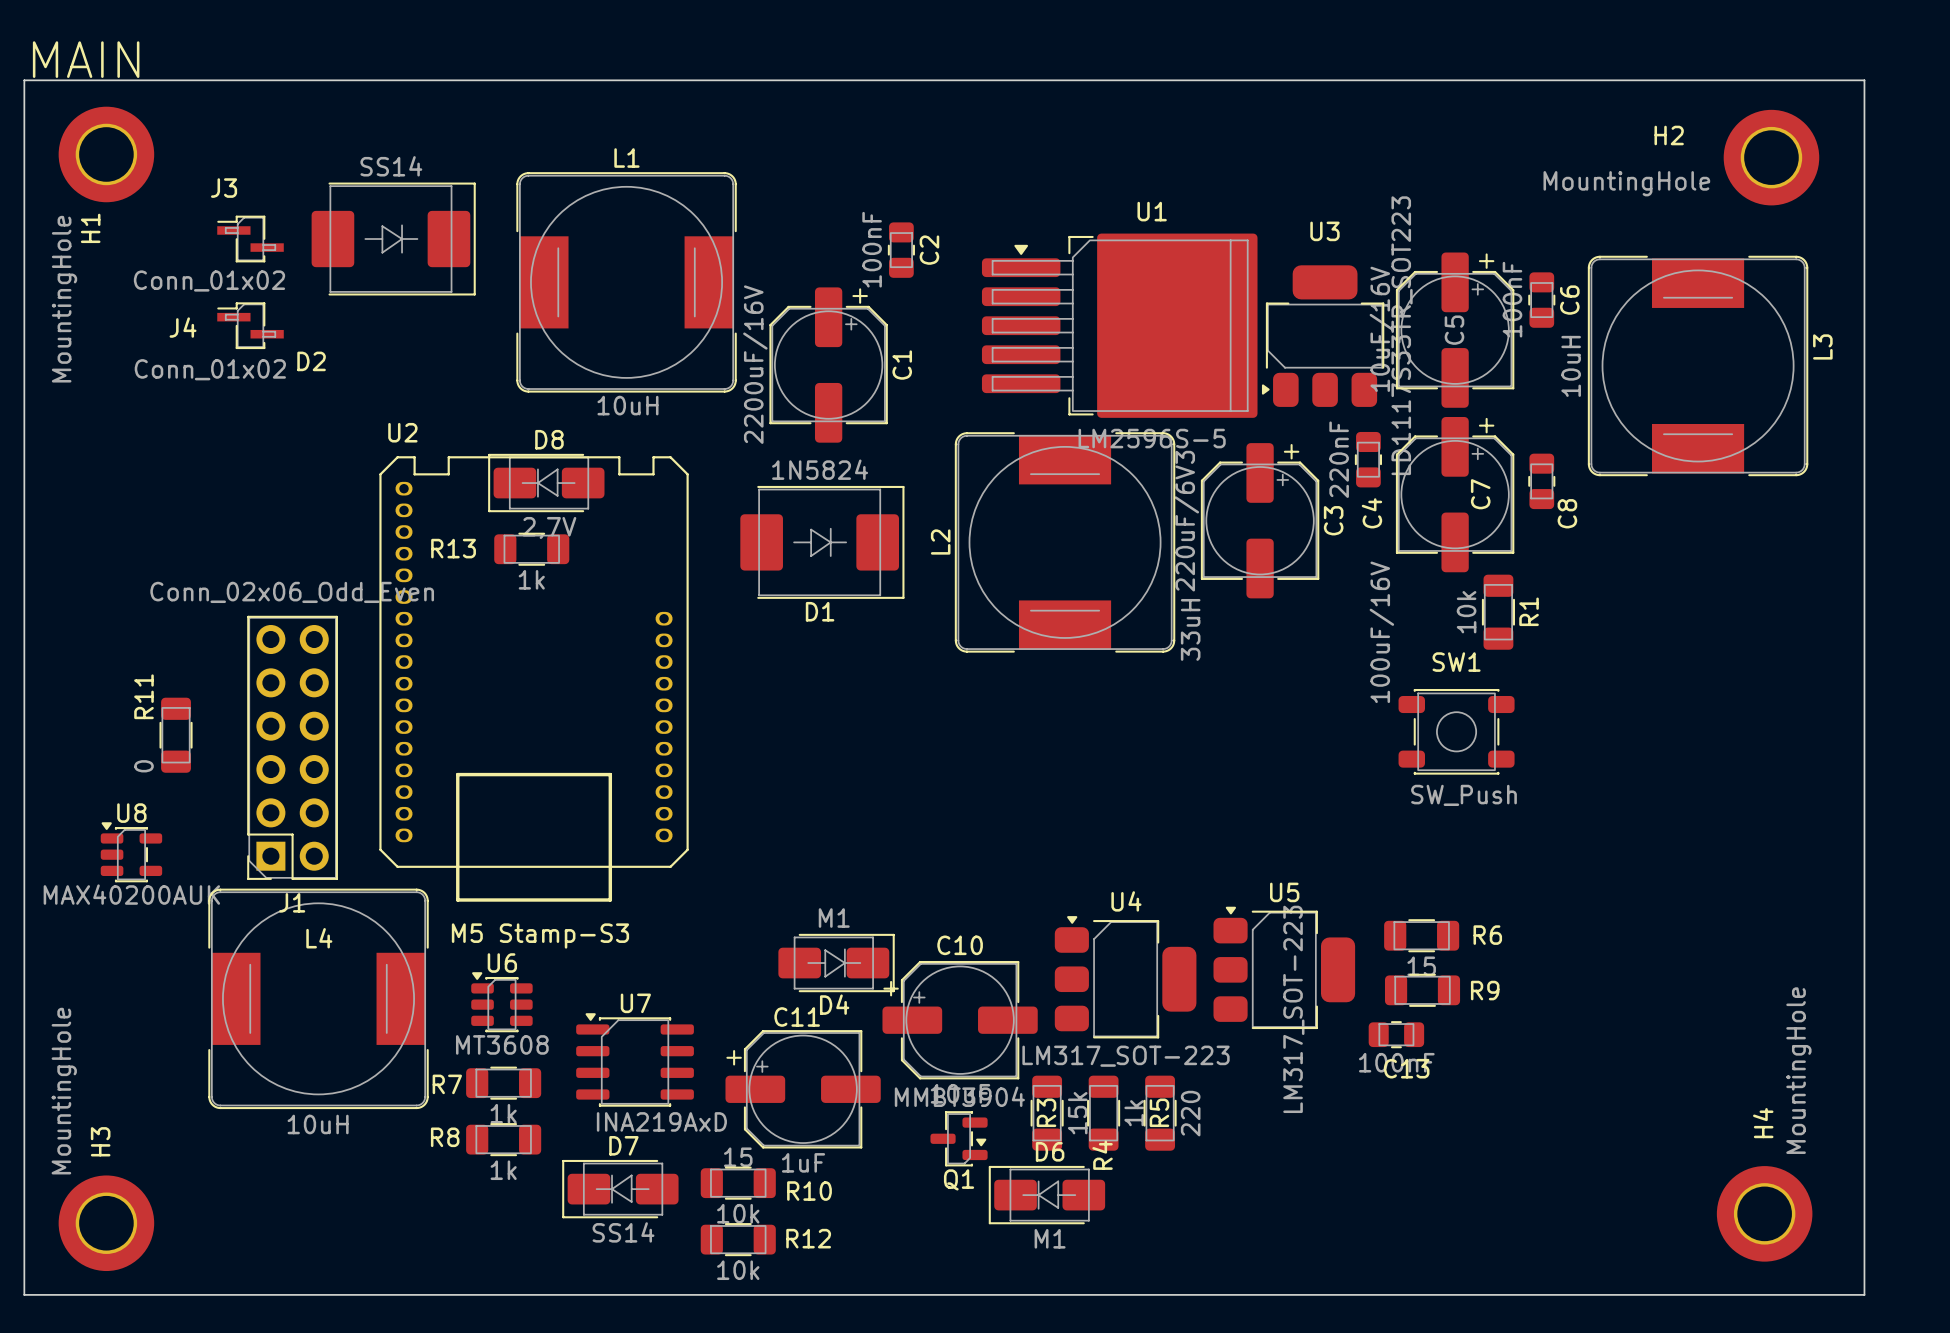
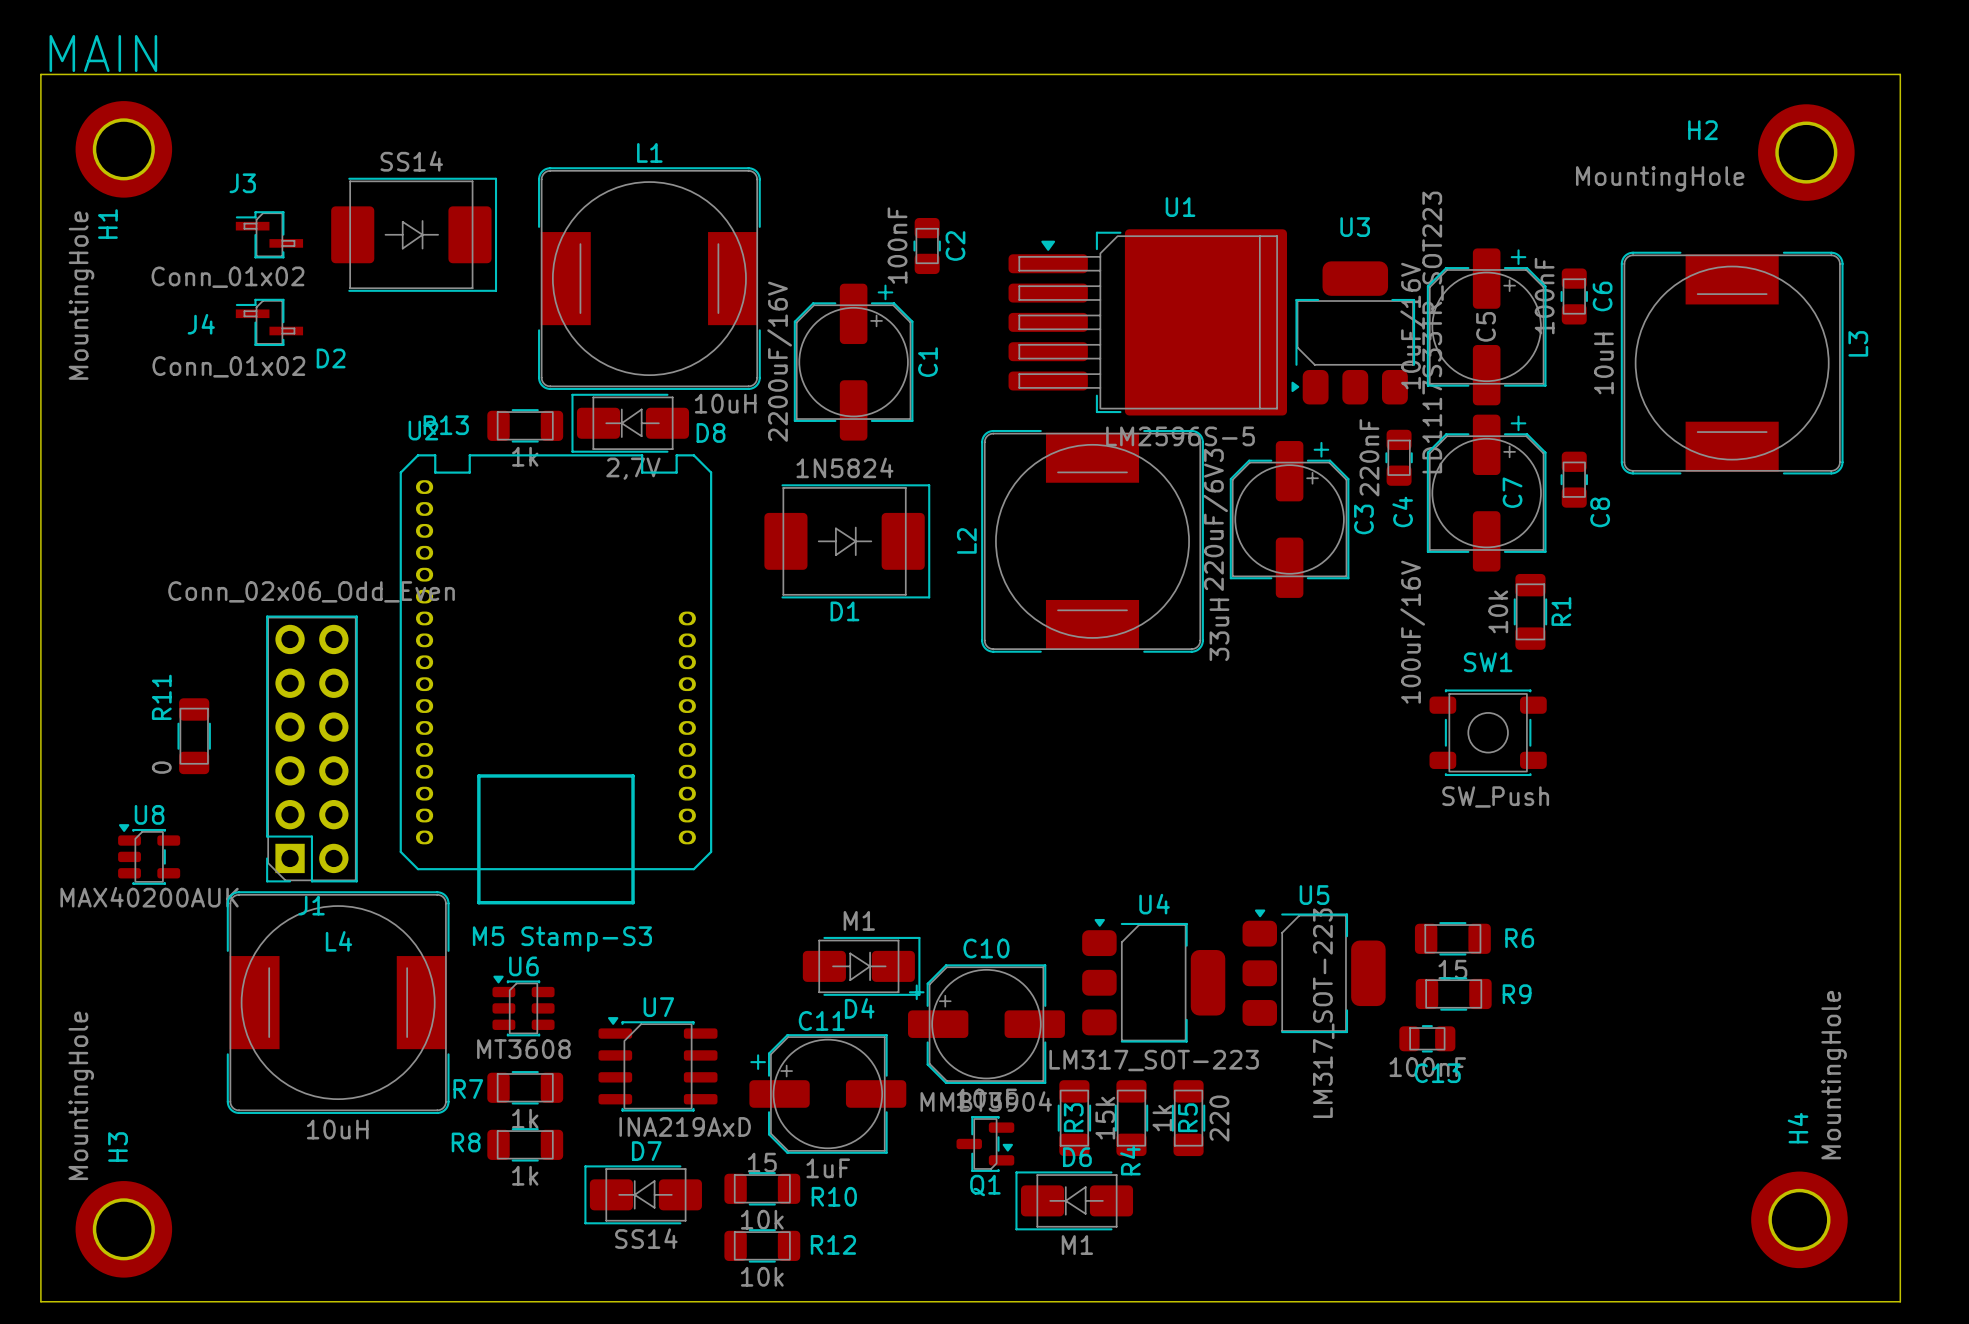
L1 value position: 10uH (627, 405) -> 10uH (725, 403)
D8 name position: D8 (549, 439) -> D8 (711, 432)
D8 position: (546, 483) -> (630, 423)
R13 position: (531, 549) -> (525, 425)

